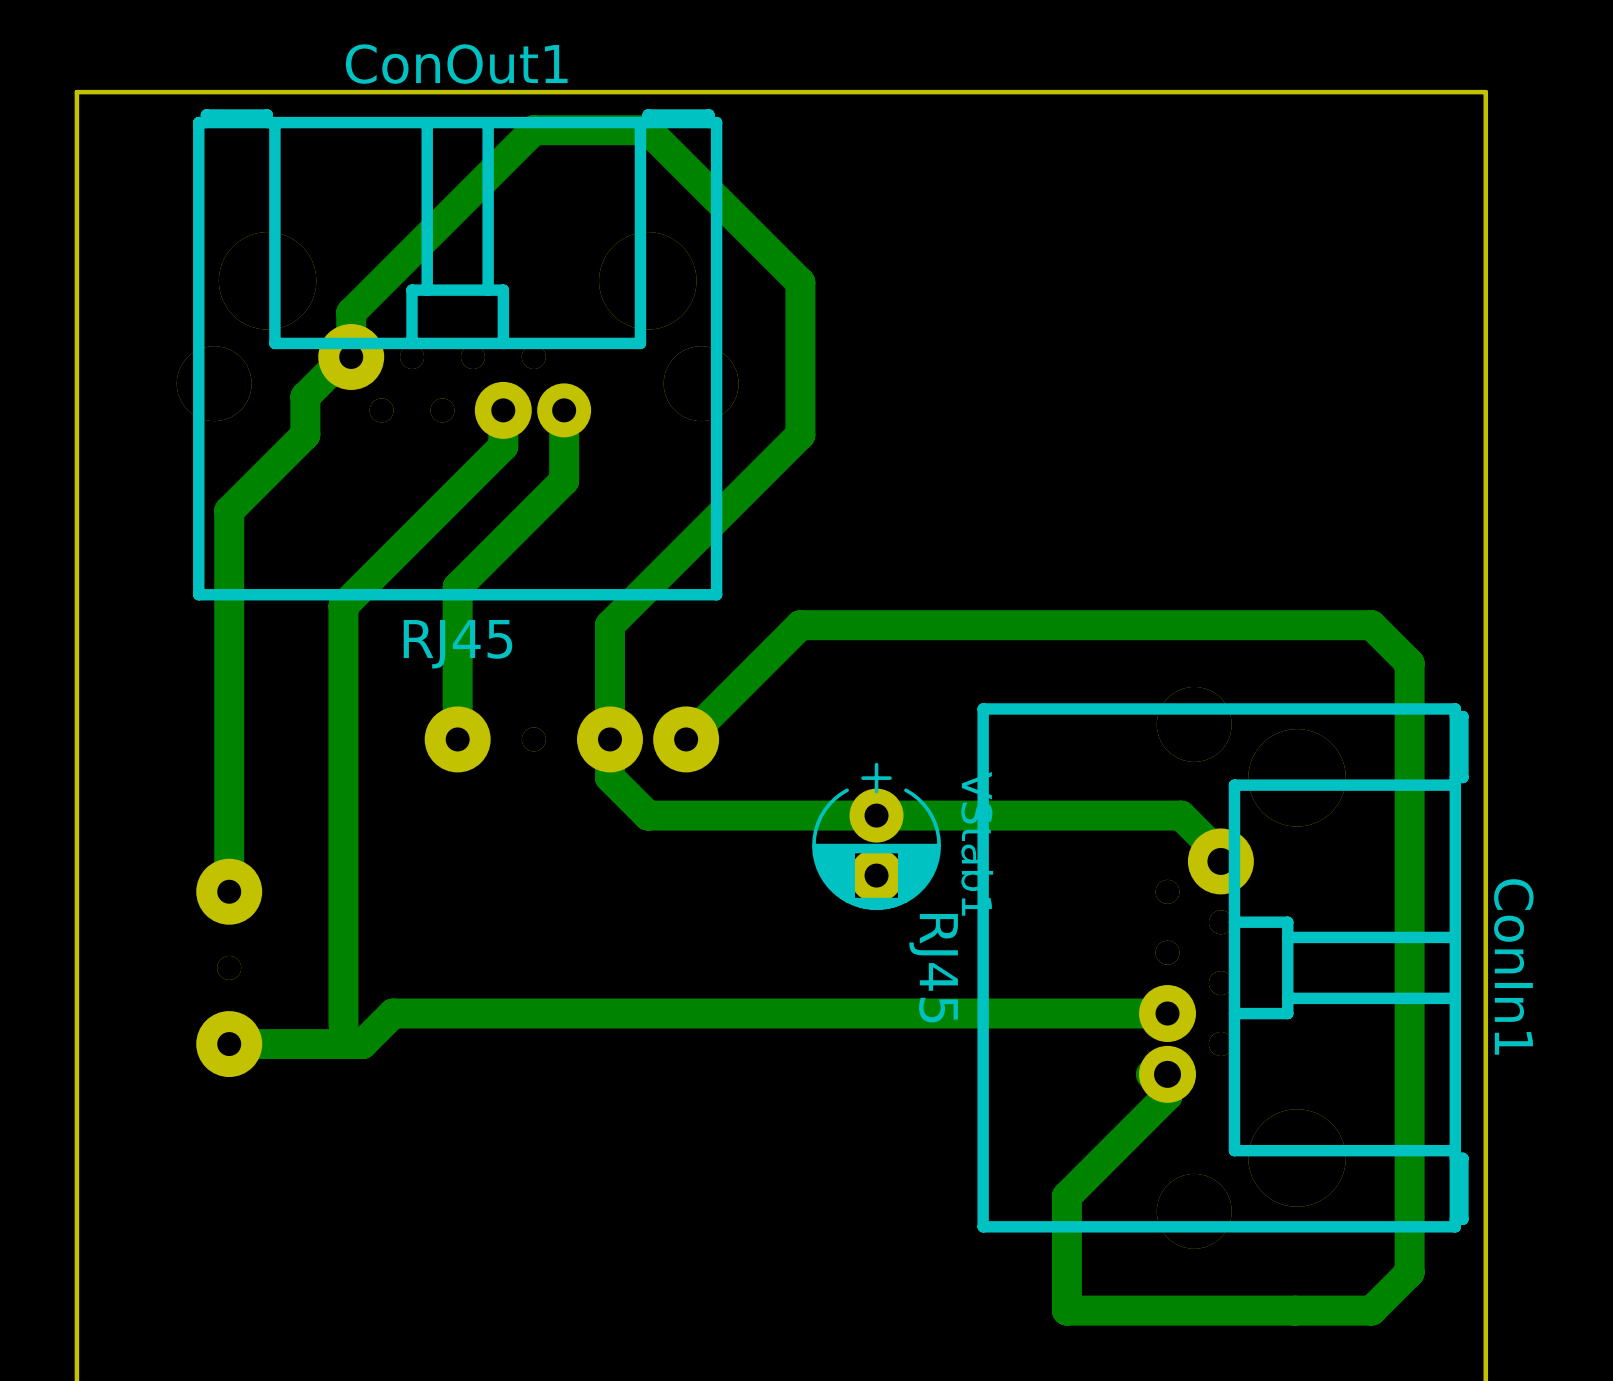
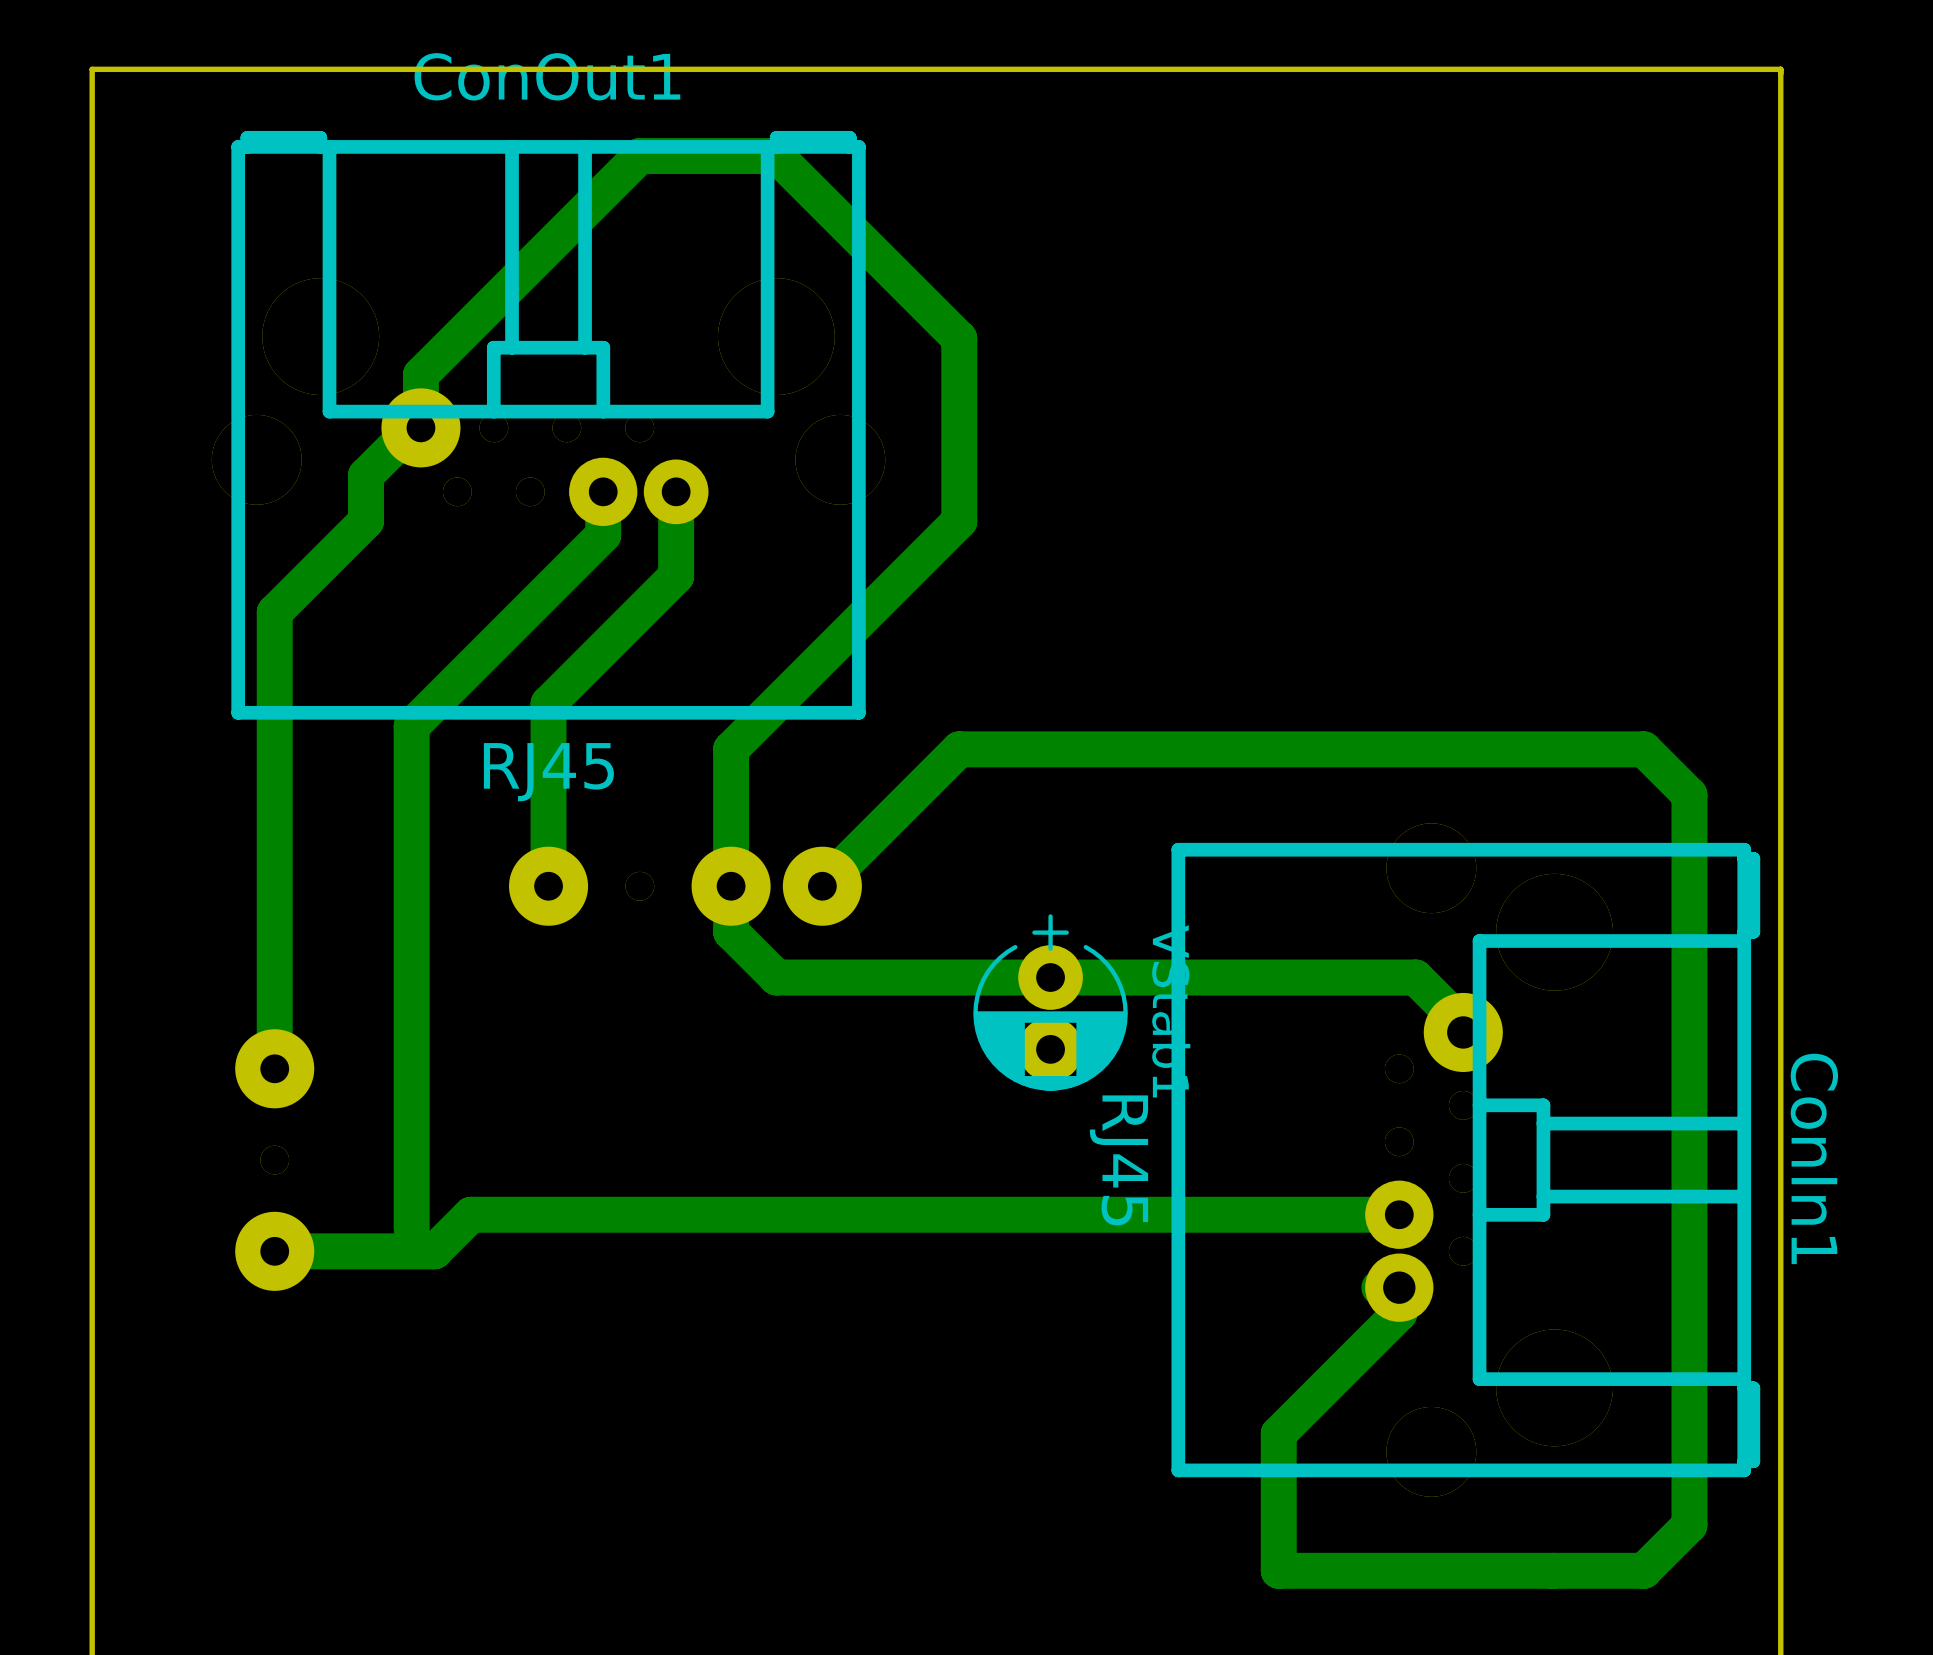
board edge: (1485, 92) (76, 92) -> (1780, 110) (1780, 69) (92, 69) (92, 110)

